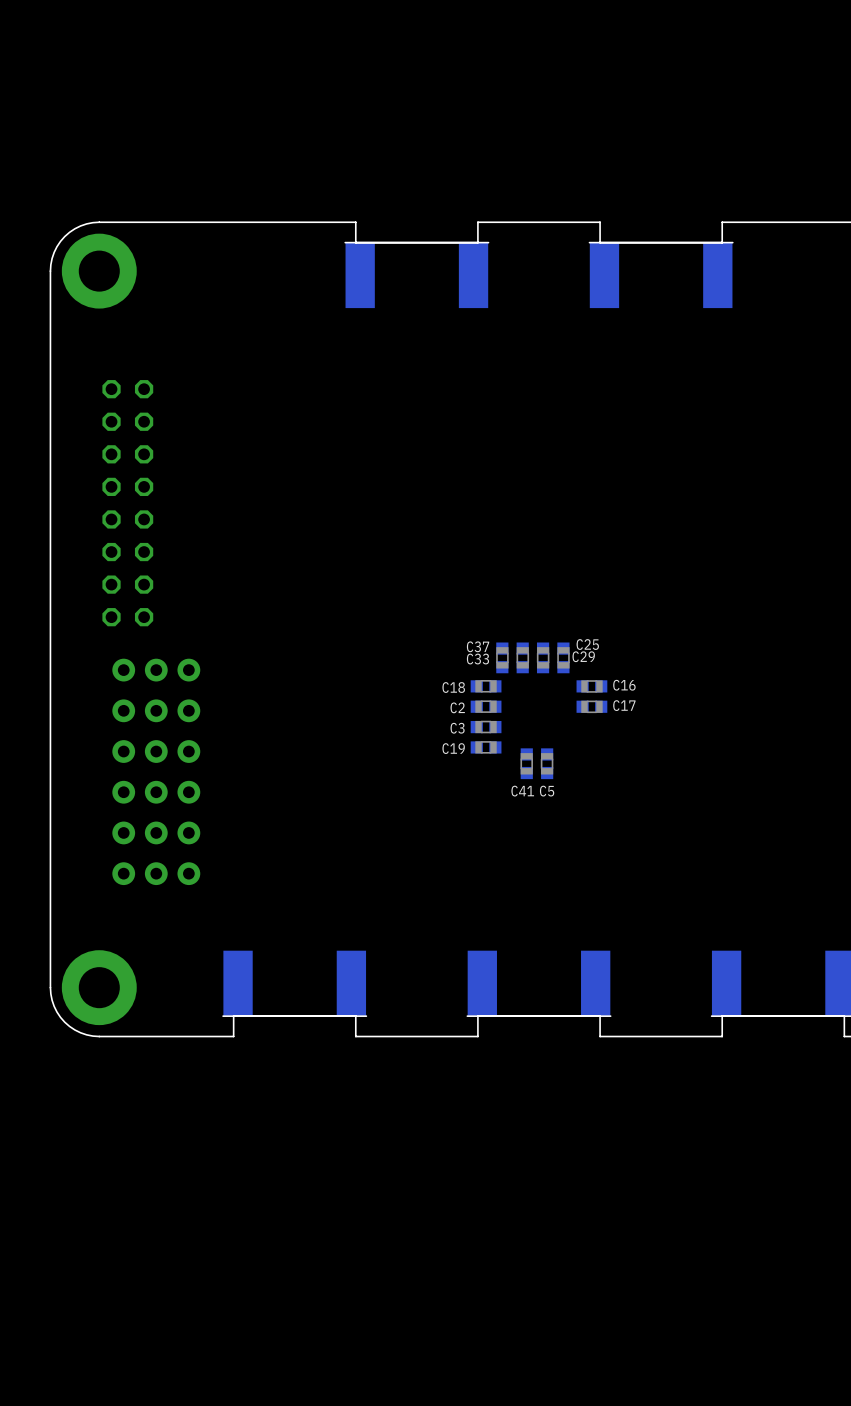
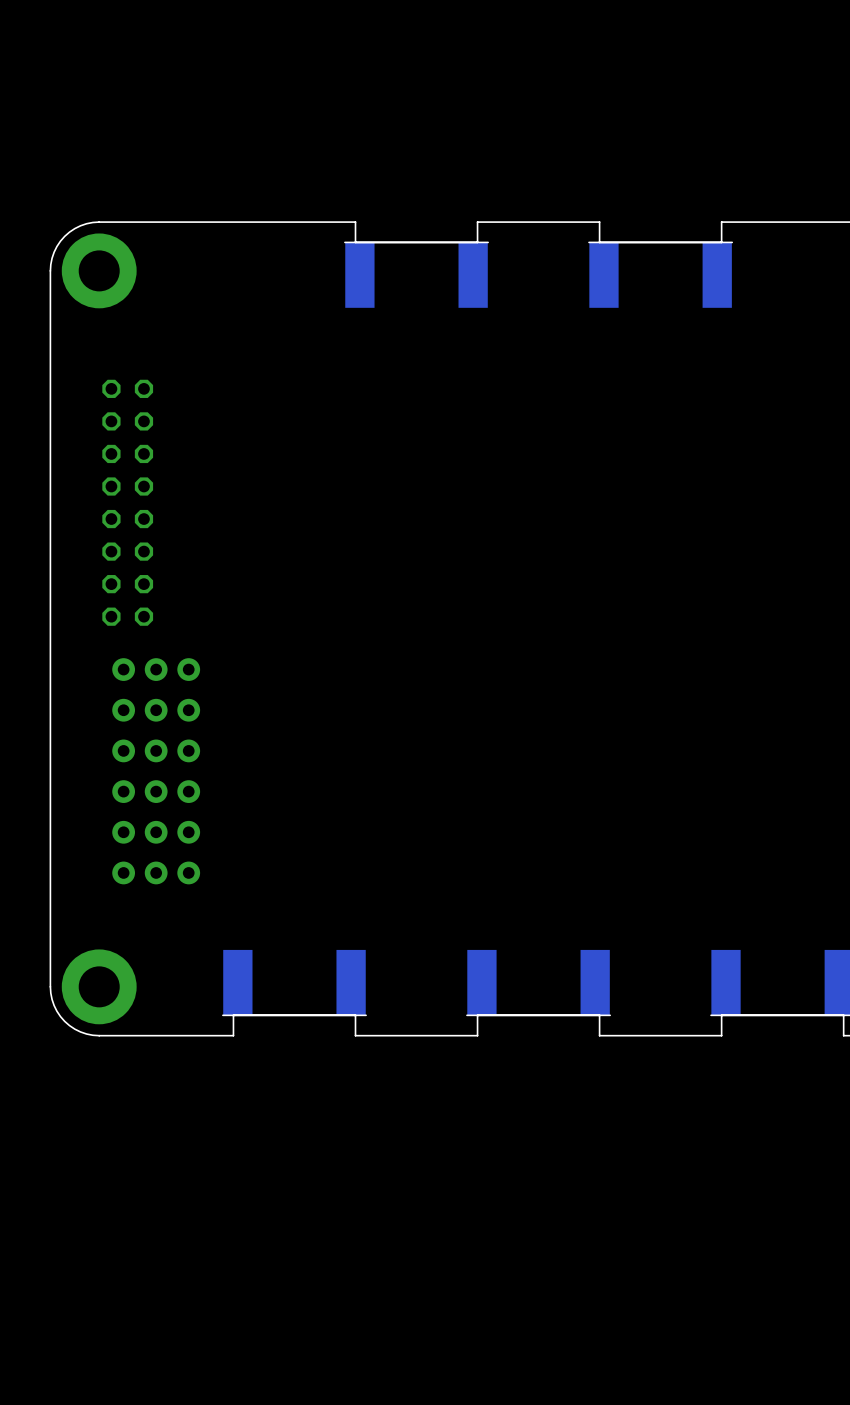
C37: (502, 657) -> none
C33: (522, 657) -> none
C29: (543, 657) -> none
C25: (563, 657) -> none
C18: (486, 686) -> none
C16: (591, 686) -> none
C2: (486, 706) -> none
C17: (591, 706) -> none
C3: (486, 727) -> none
C19: (486, 747) -> none
C41: (526, 763) -> none
C5: (547, 763) -> none

